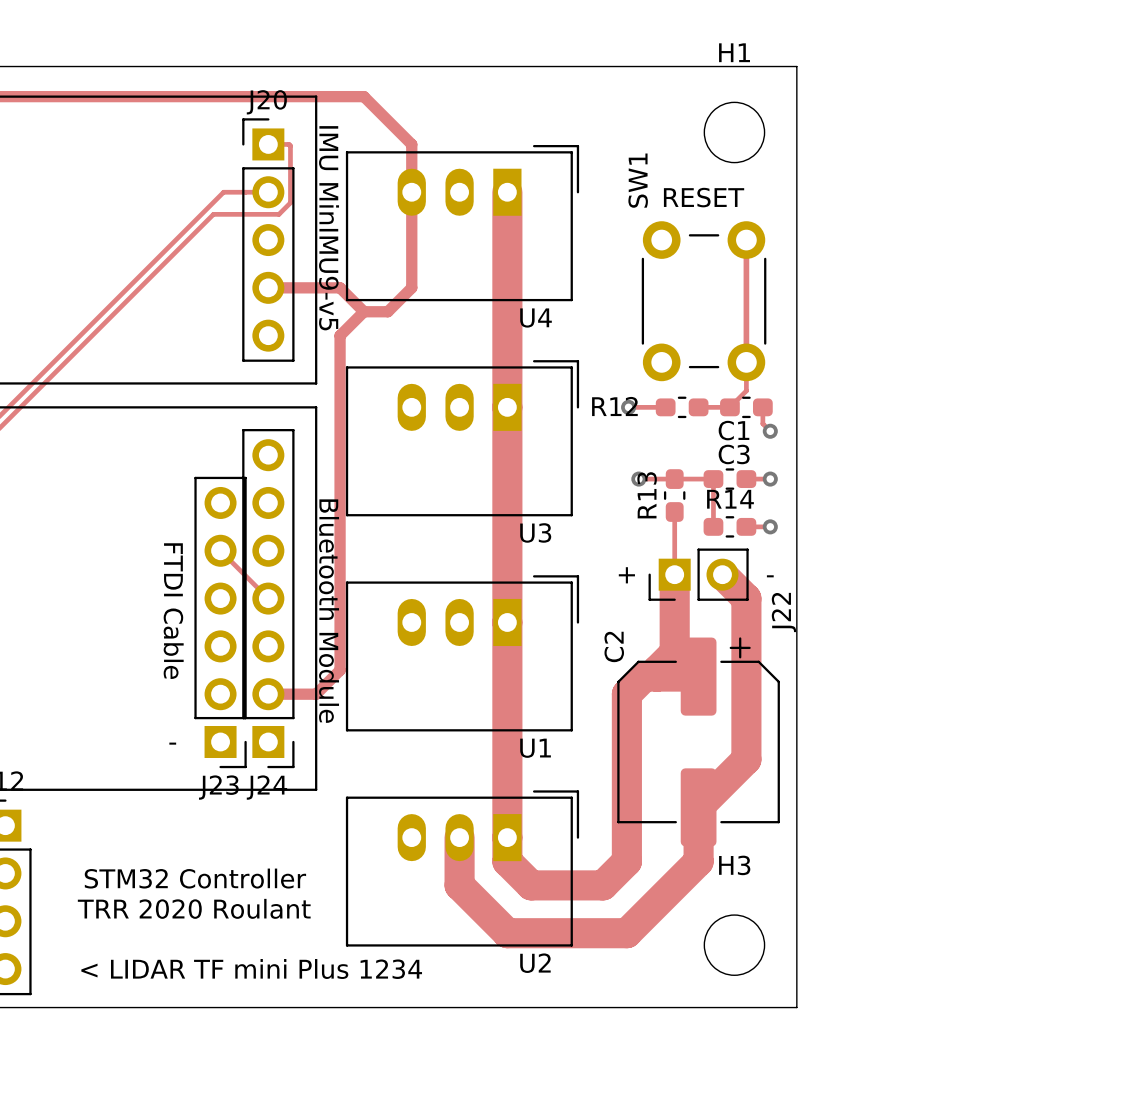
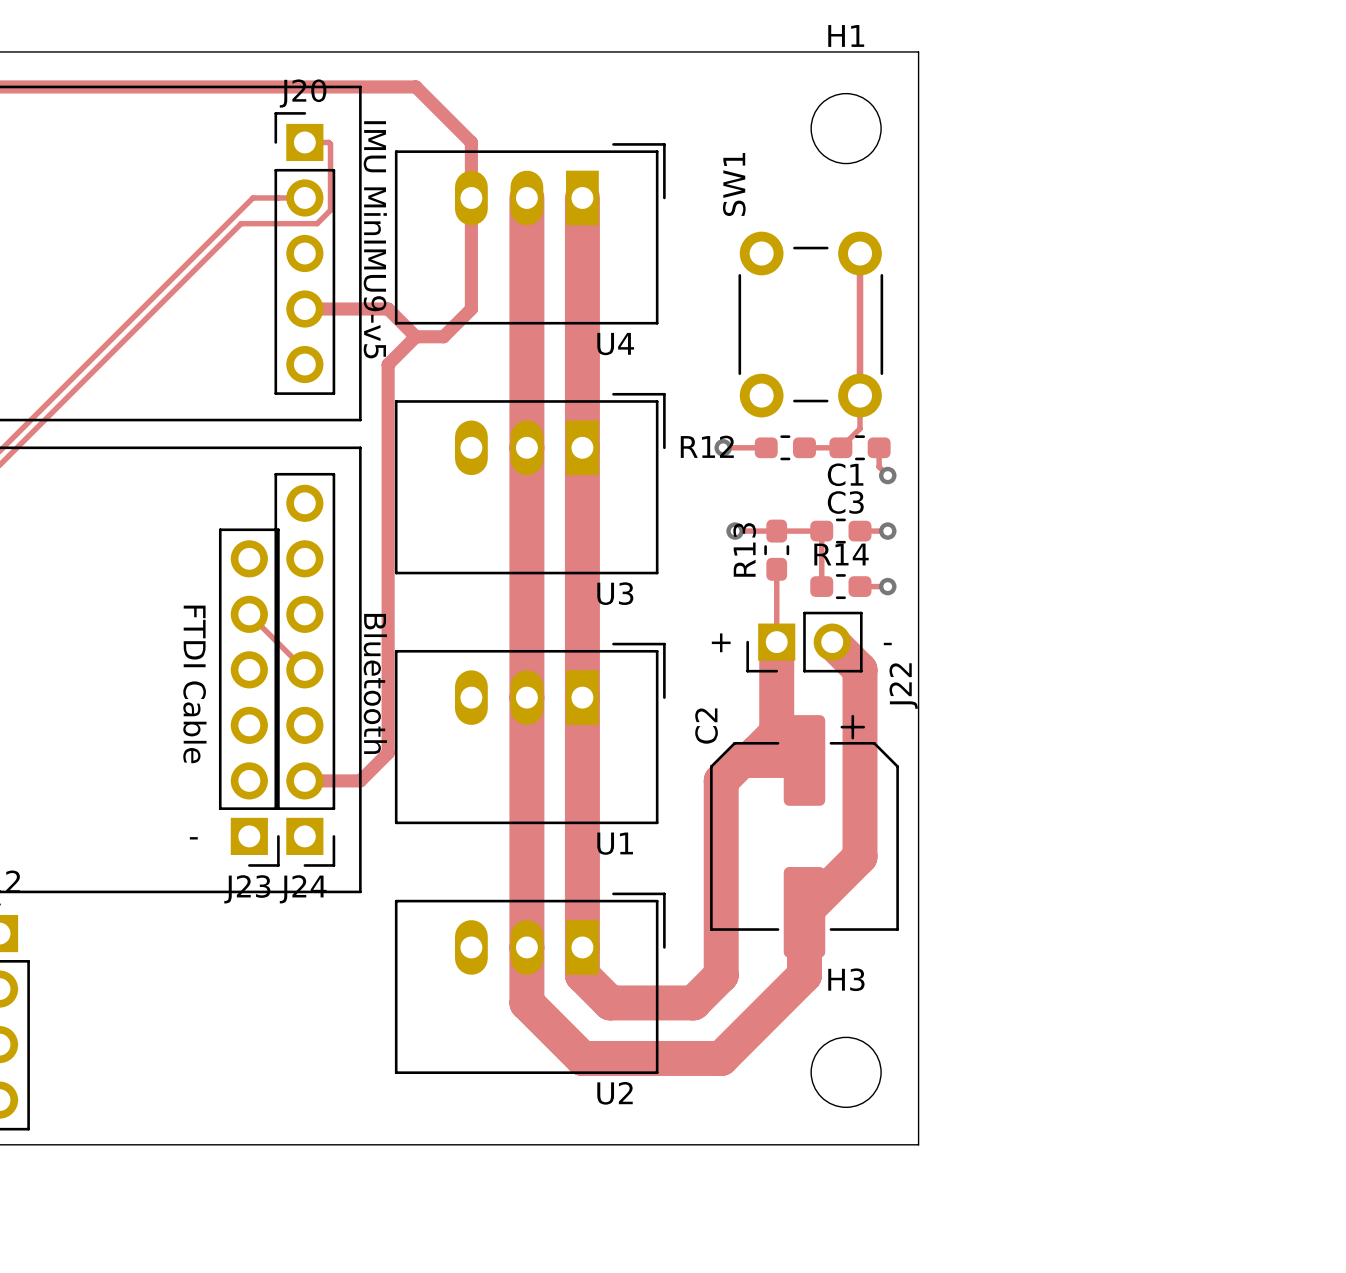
track: none -> (526, 197) (526, 947)
text: RESET (704, 197) -> none
text: Bluetooth Module (329, 611) -> Bluetooth (375, 683)
text: STM32 Controller (195, 878) -> none
text: TRR 2020 Roulant (194, 908) -> none
text: < LIDAR TF mini Plus 1234 (251, 968) -> none

